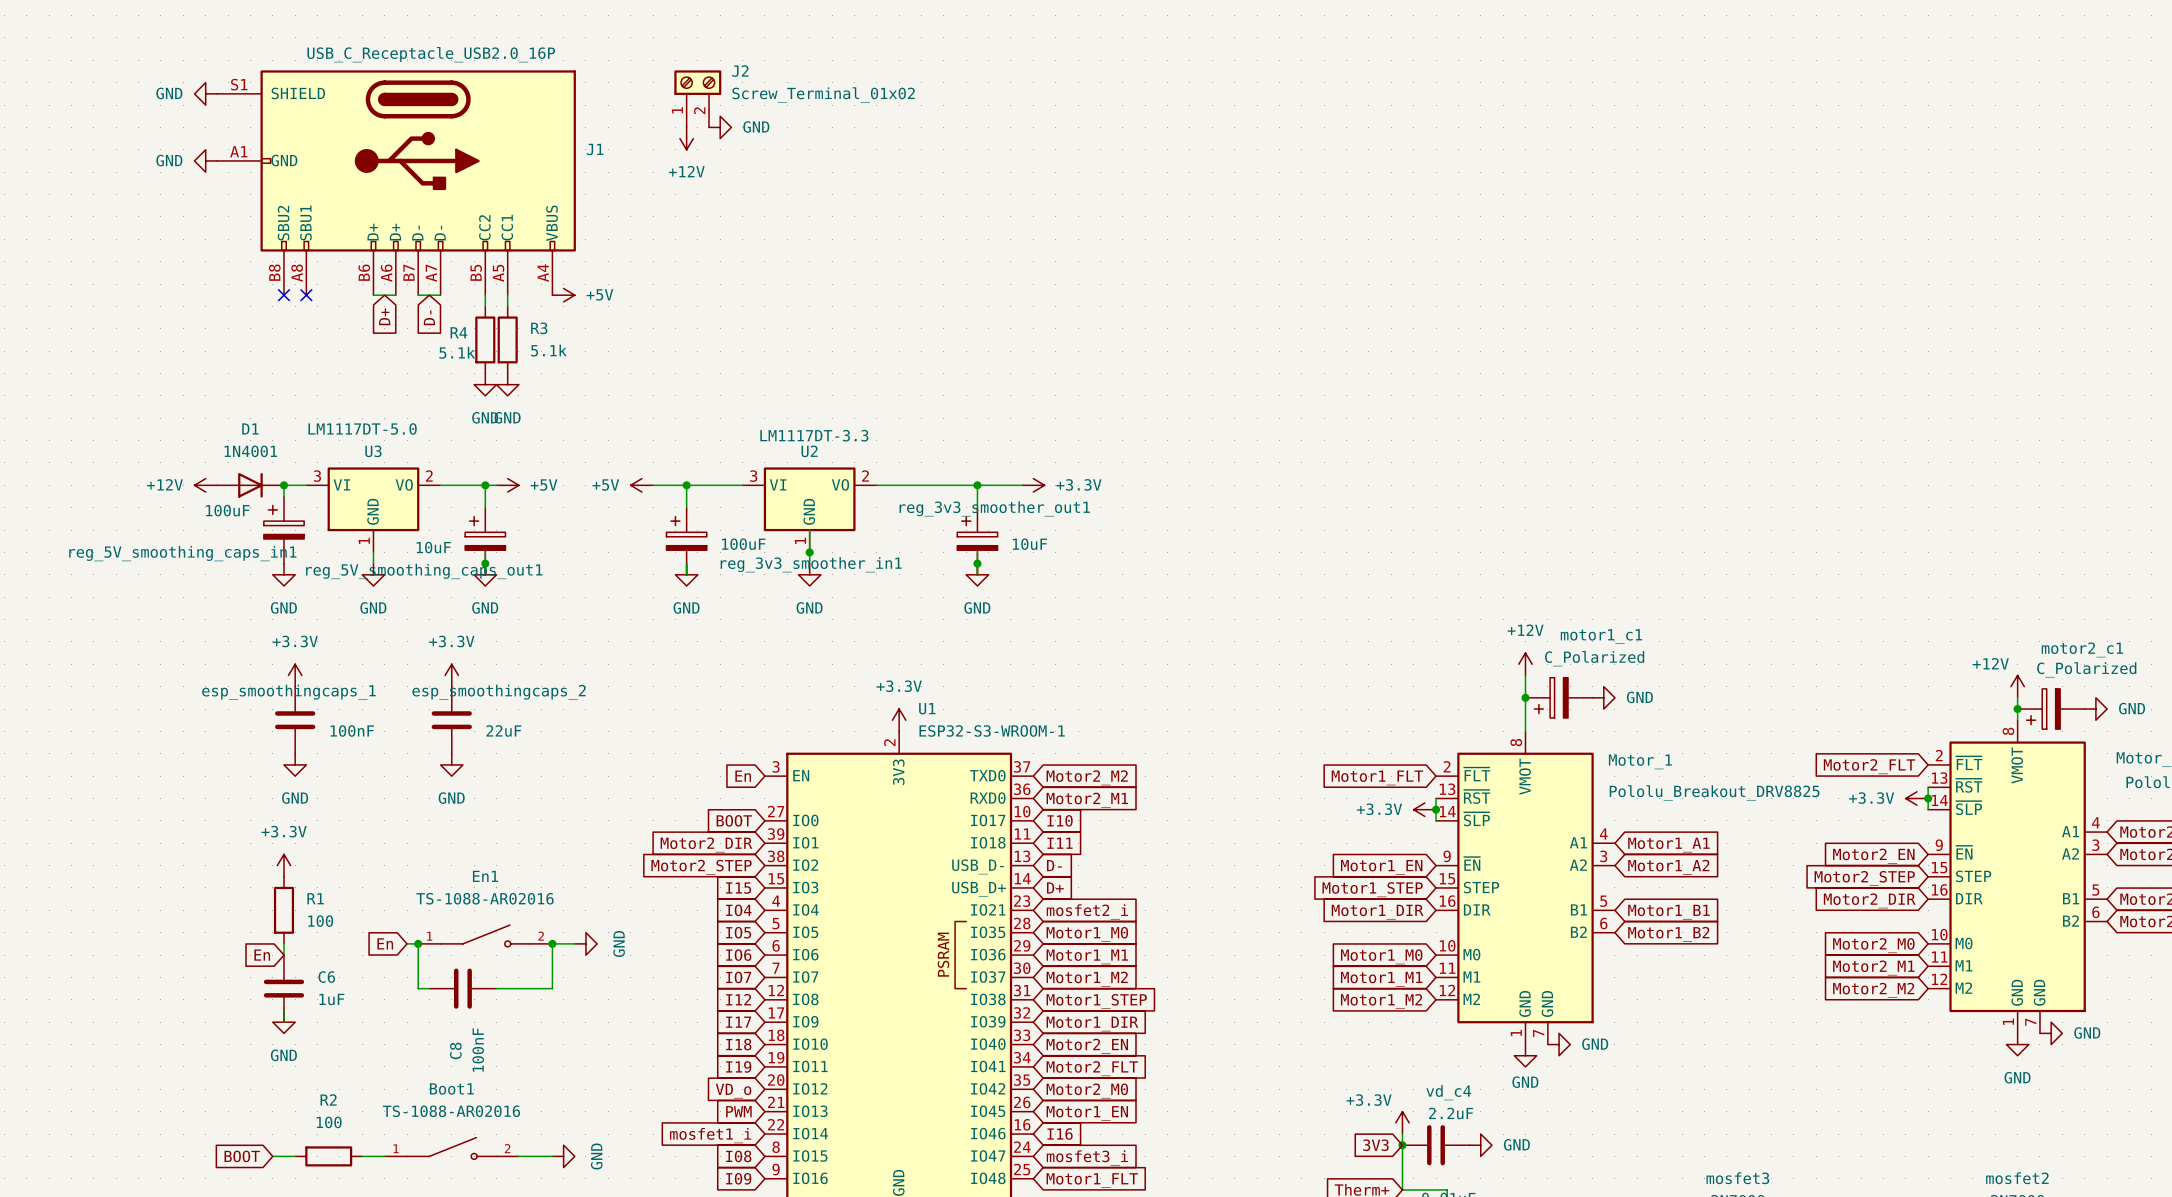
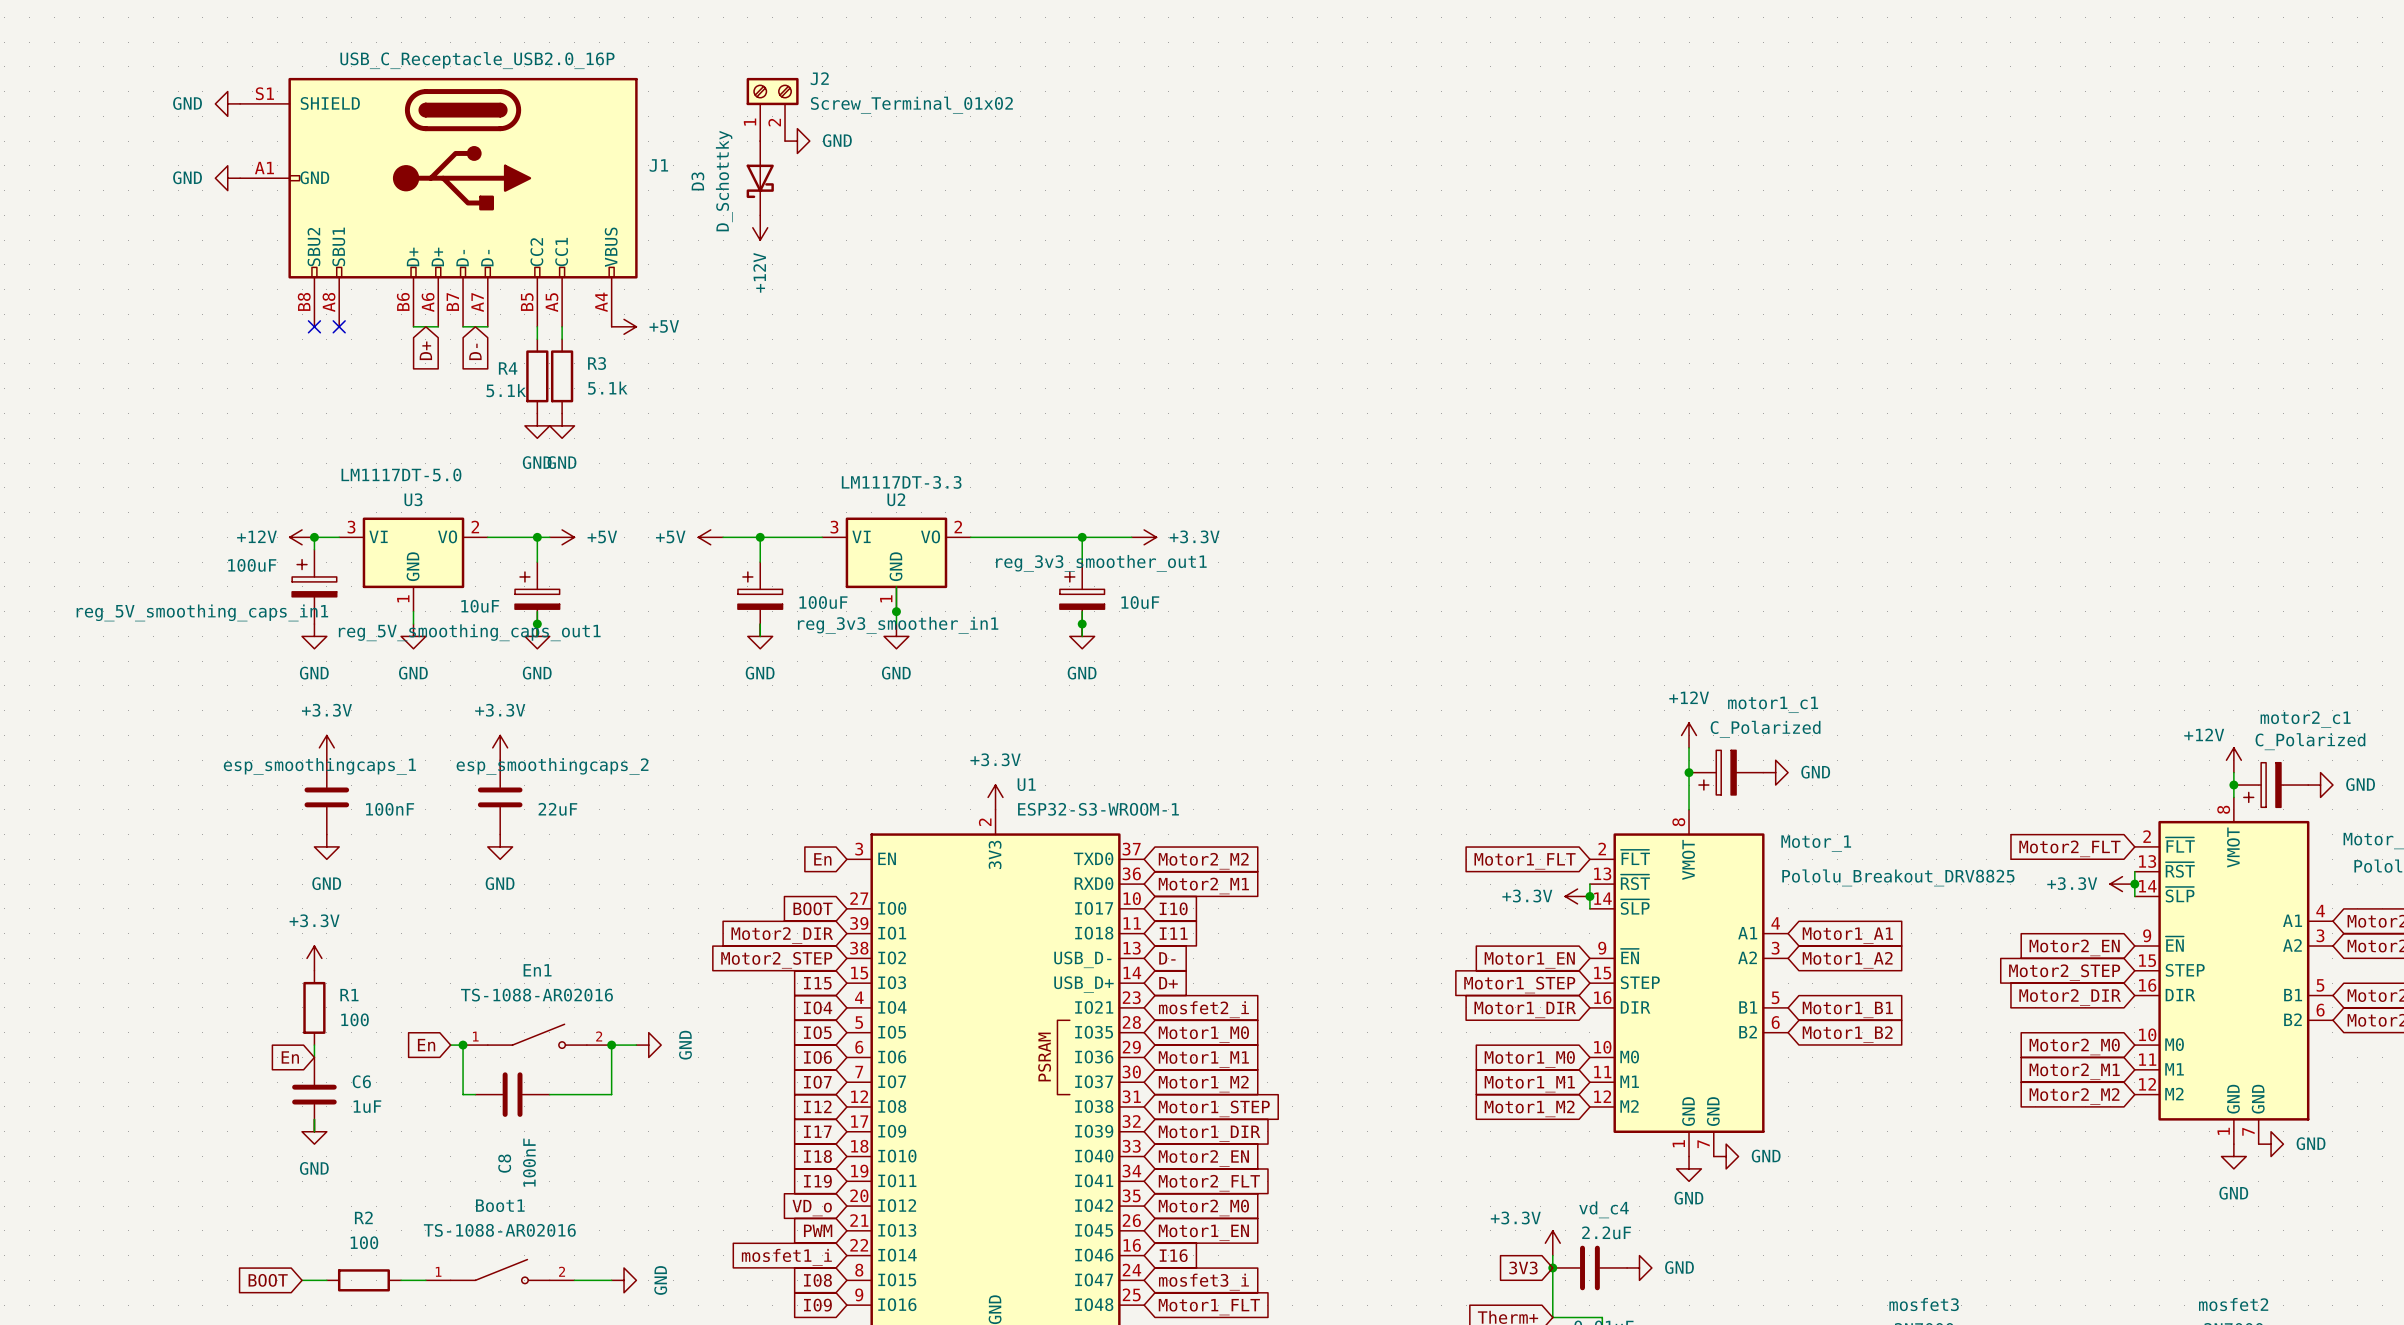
power symbol position: +12V (686, 138) -> +12V (760, 227)
D3: none -> D_Schottky (760, 178)
power symbol text rotation: 0° (686, 171) -> 90° counterclockwise (759, 272)
power symbol position: +12V (205, 485) -> +12V (302, 537)
D1: 1N4001 (250, 485) -> none

